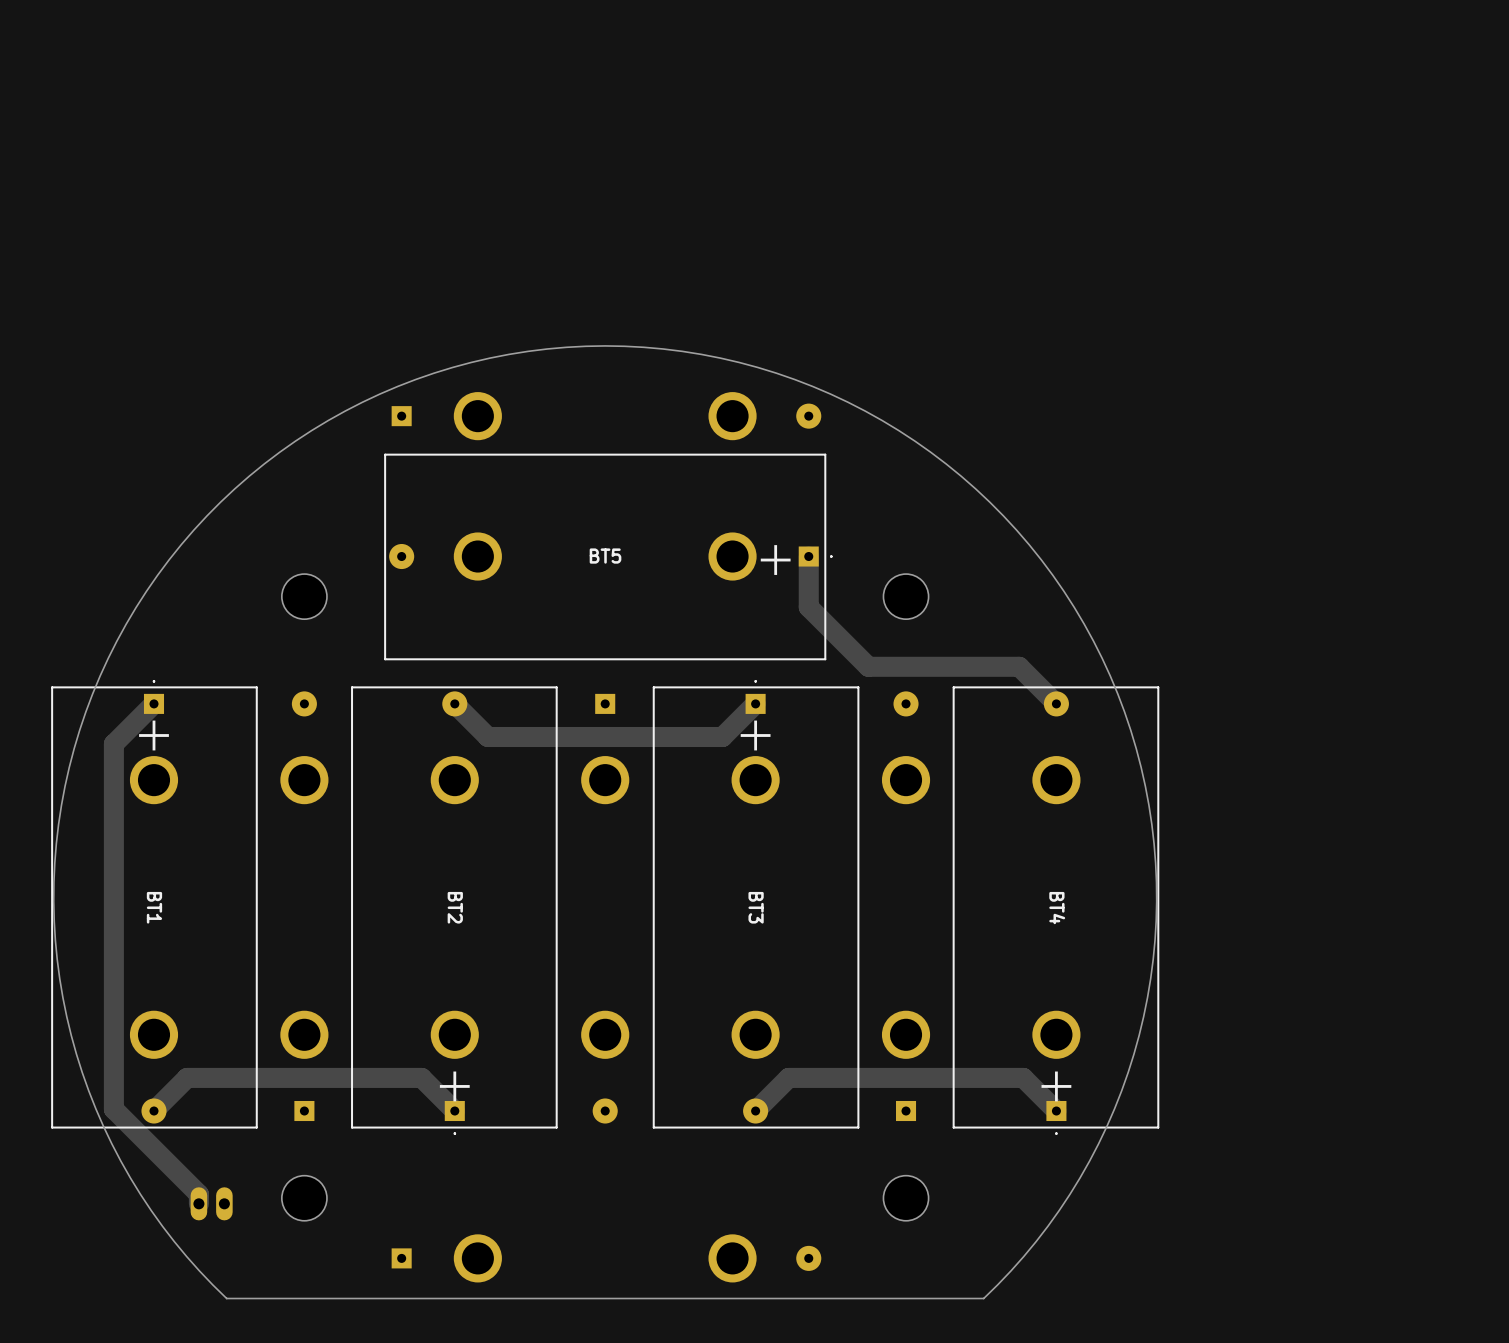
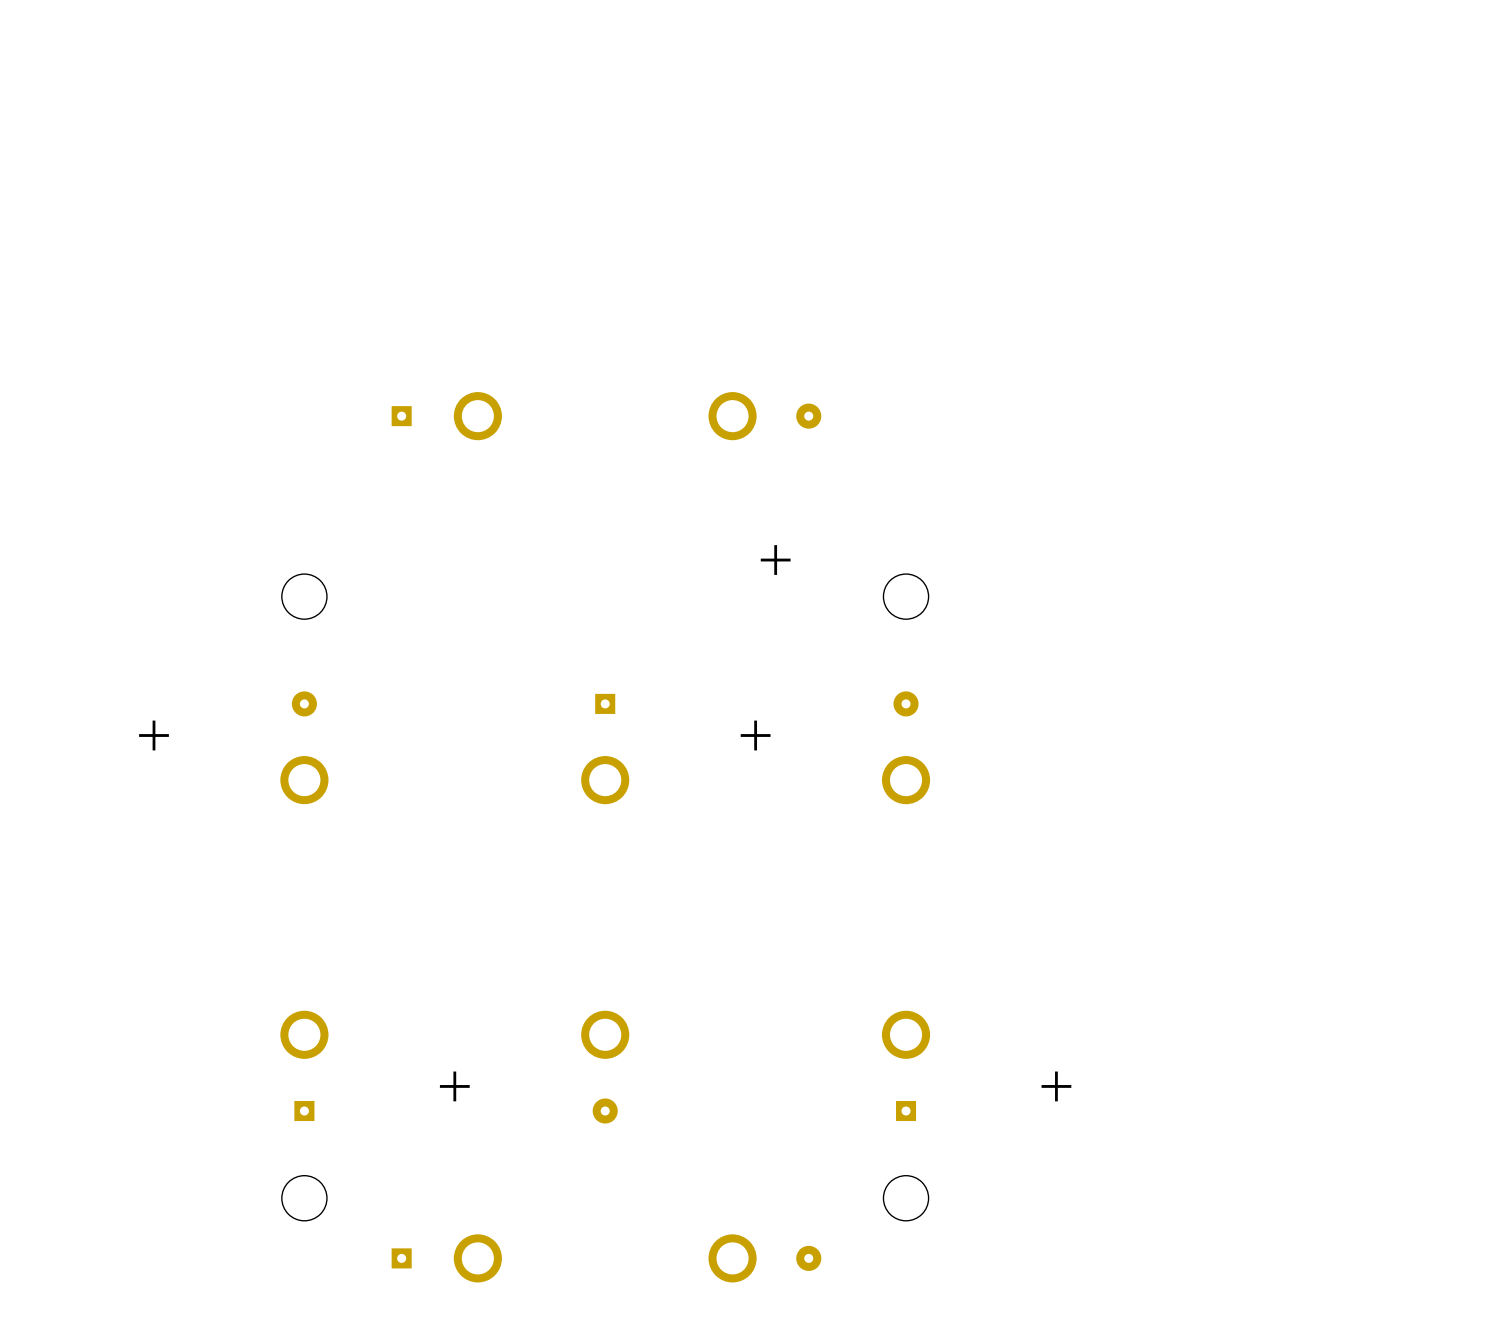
BT5: (608, 556) -> none
track: (808, 556) (808, 607) (868, 666) (1019, 666) (1056, 703) -> none
track: (154, 703) (113, 744) (113, 1109) (198, 1194) (198, 1203) -> none
track: (755, 703) (722, 737) (487, 737) (454, 703) -> none
BT1: (154, 904) -> none
BT3: (756, 904) -> none
BT2: (454, 910) -> none
BT4: (1055, 910) -> none
track: (454, 1111) (421, 1077) (187, 1077) (154, 1111) -> none
track: (1056, 1111) (1023, 1077) (788, 1077) (755, 1111) -> none
part: (211, 1203) -> none
board edge: (983, 1298) (226, 1298) (212, 1284) (174, 1241) (140, 1194) (120, 1161) (95, 1108) (76, 1054) (62, 997) (55, 940) (53, 882) (58, 824) (69, 767) (79, 730) (100, 675) (126, 624) (146, 591) (181, 544) (220, 502) (264, 463) (311, 430) (362, 402) (397, 386) (452, 367) (508, 354) (566, 347) (605, 345) (663, 348) (720, 358) (776, 373) (830, 394) (882, 420) (914, 441) (961, 476) (1003, 515) (1041, 559) (1074, 607) (1102, 658) (1117, 693) (1136, 748) (1148, 805) (1155, 862) (1156, 920) (1150, 978) (1139, 1035) (1128, 1072) (1106, 1126) (1089, 1161) (1059, 1210) (1023, 1256) (983, 1298) -> none

